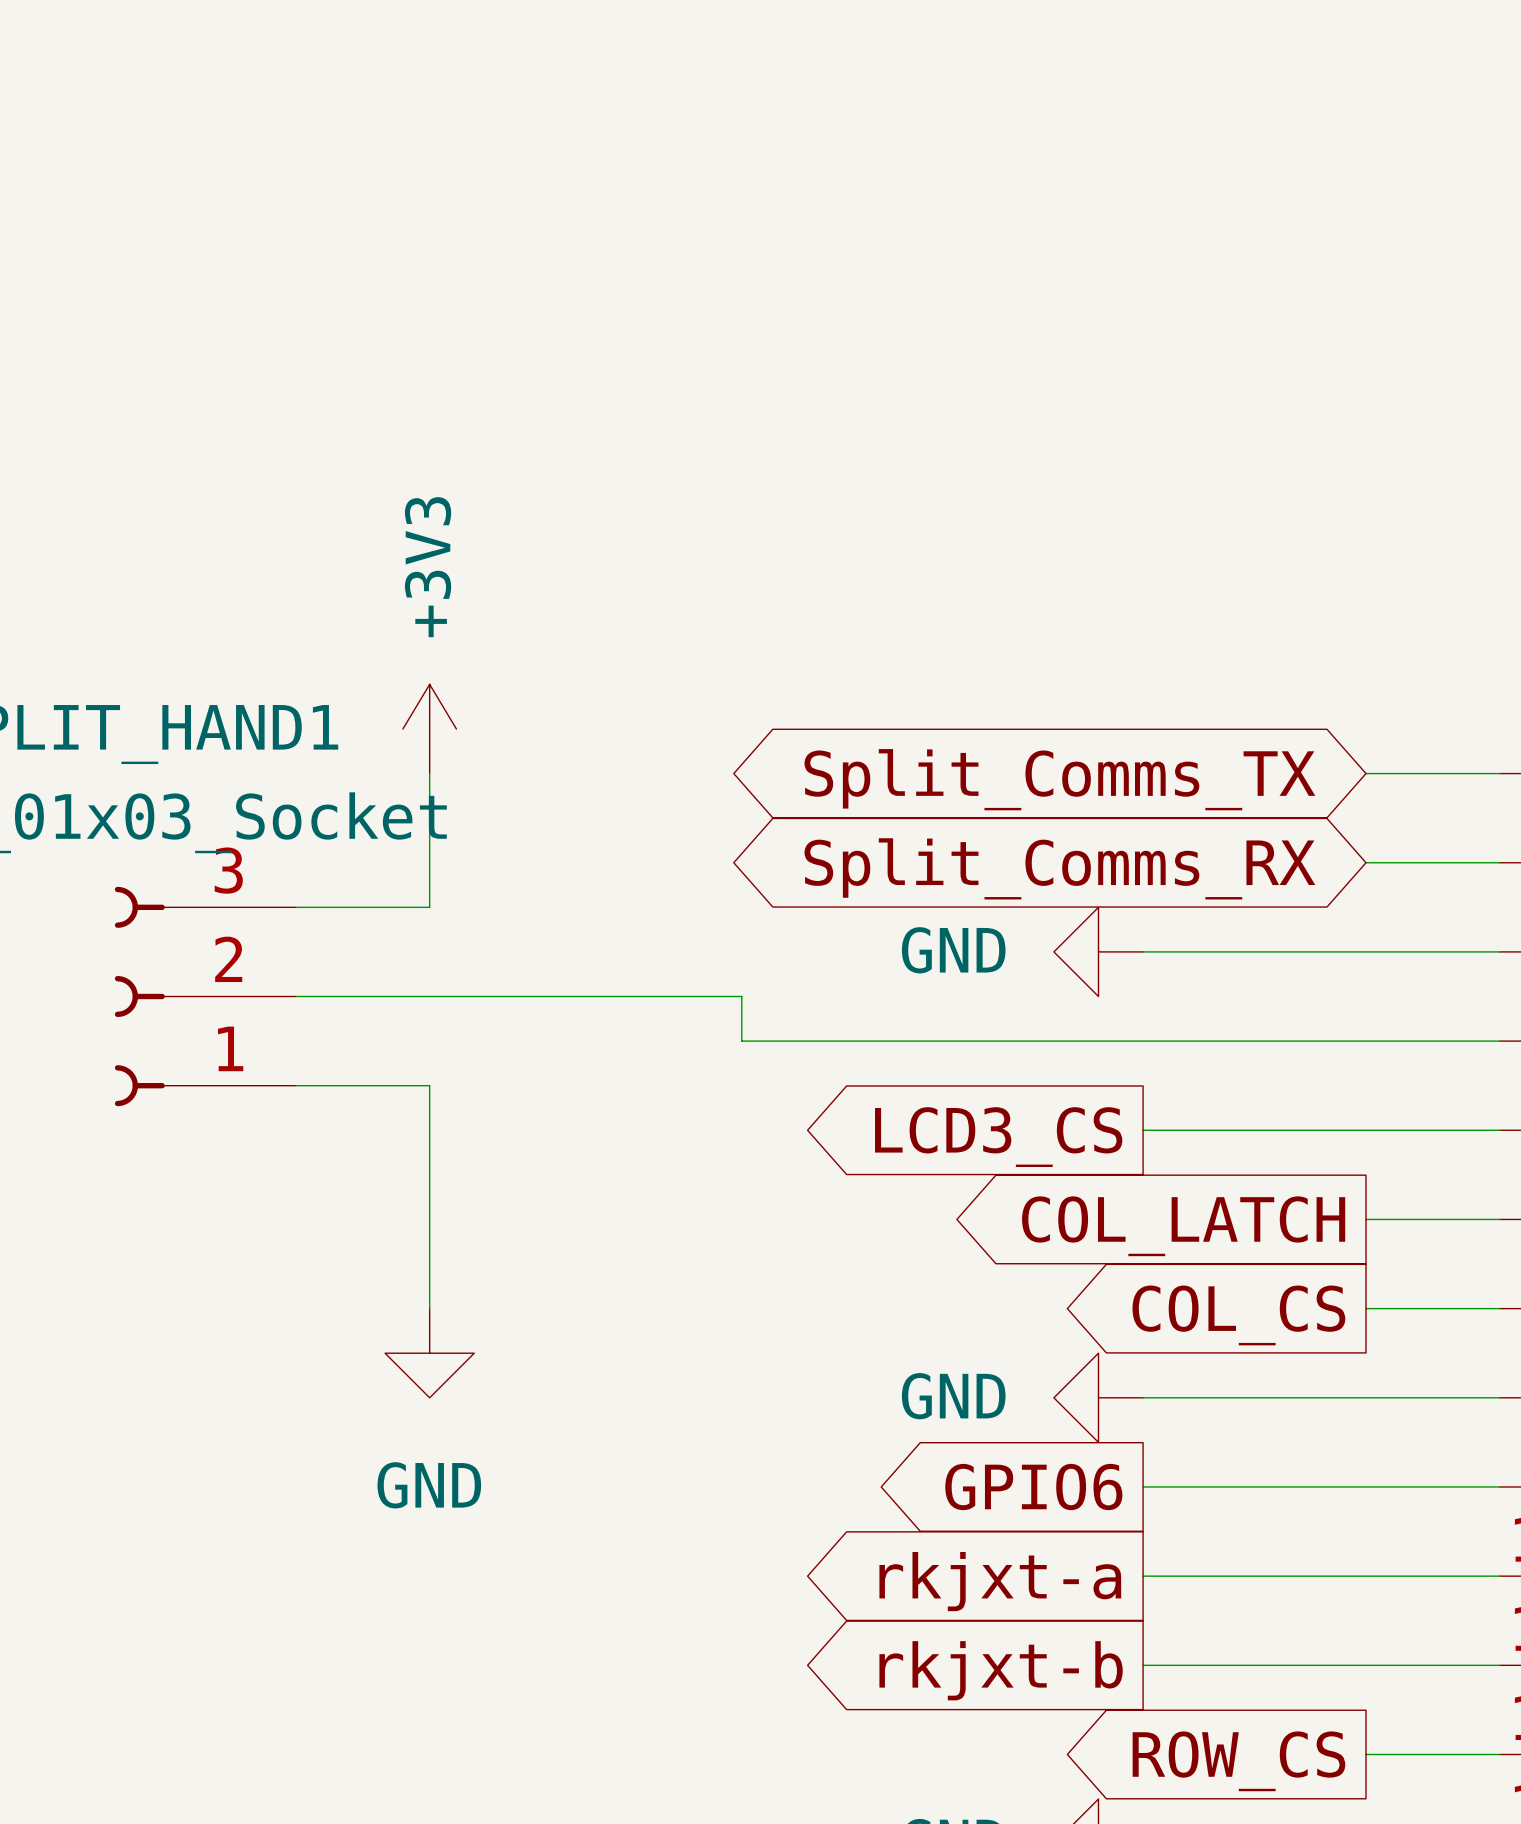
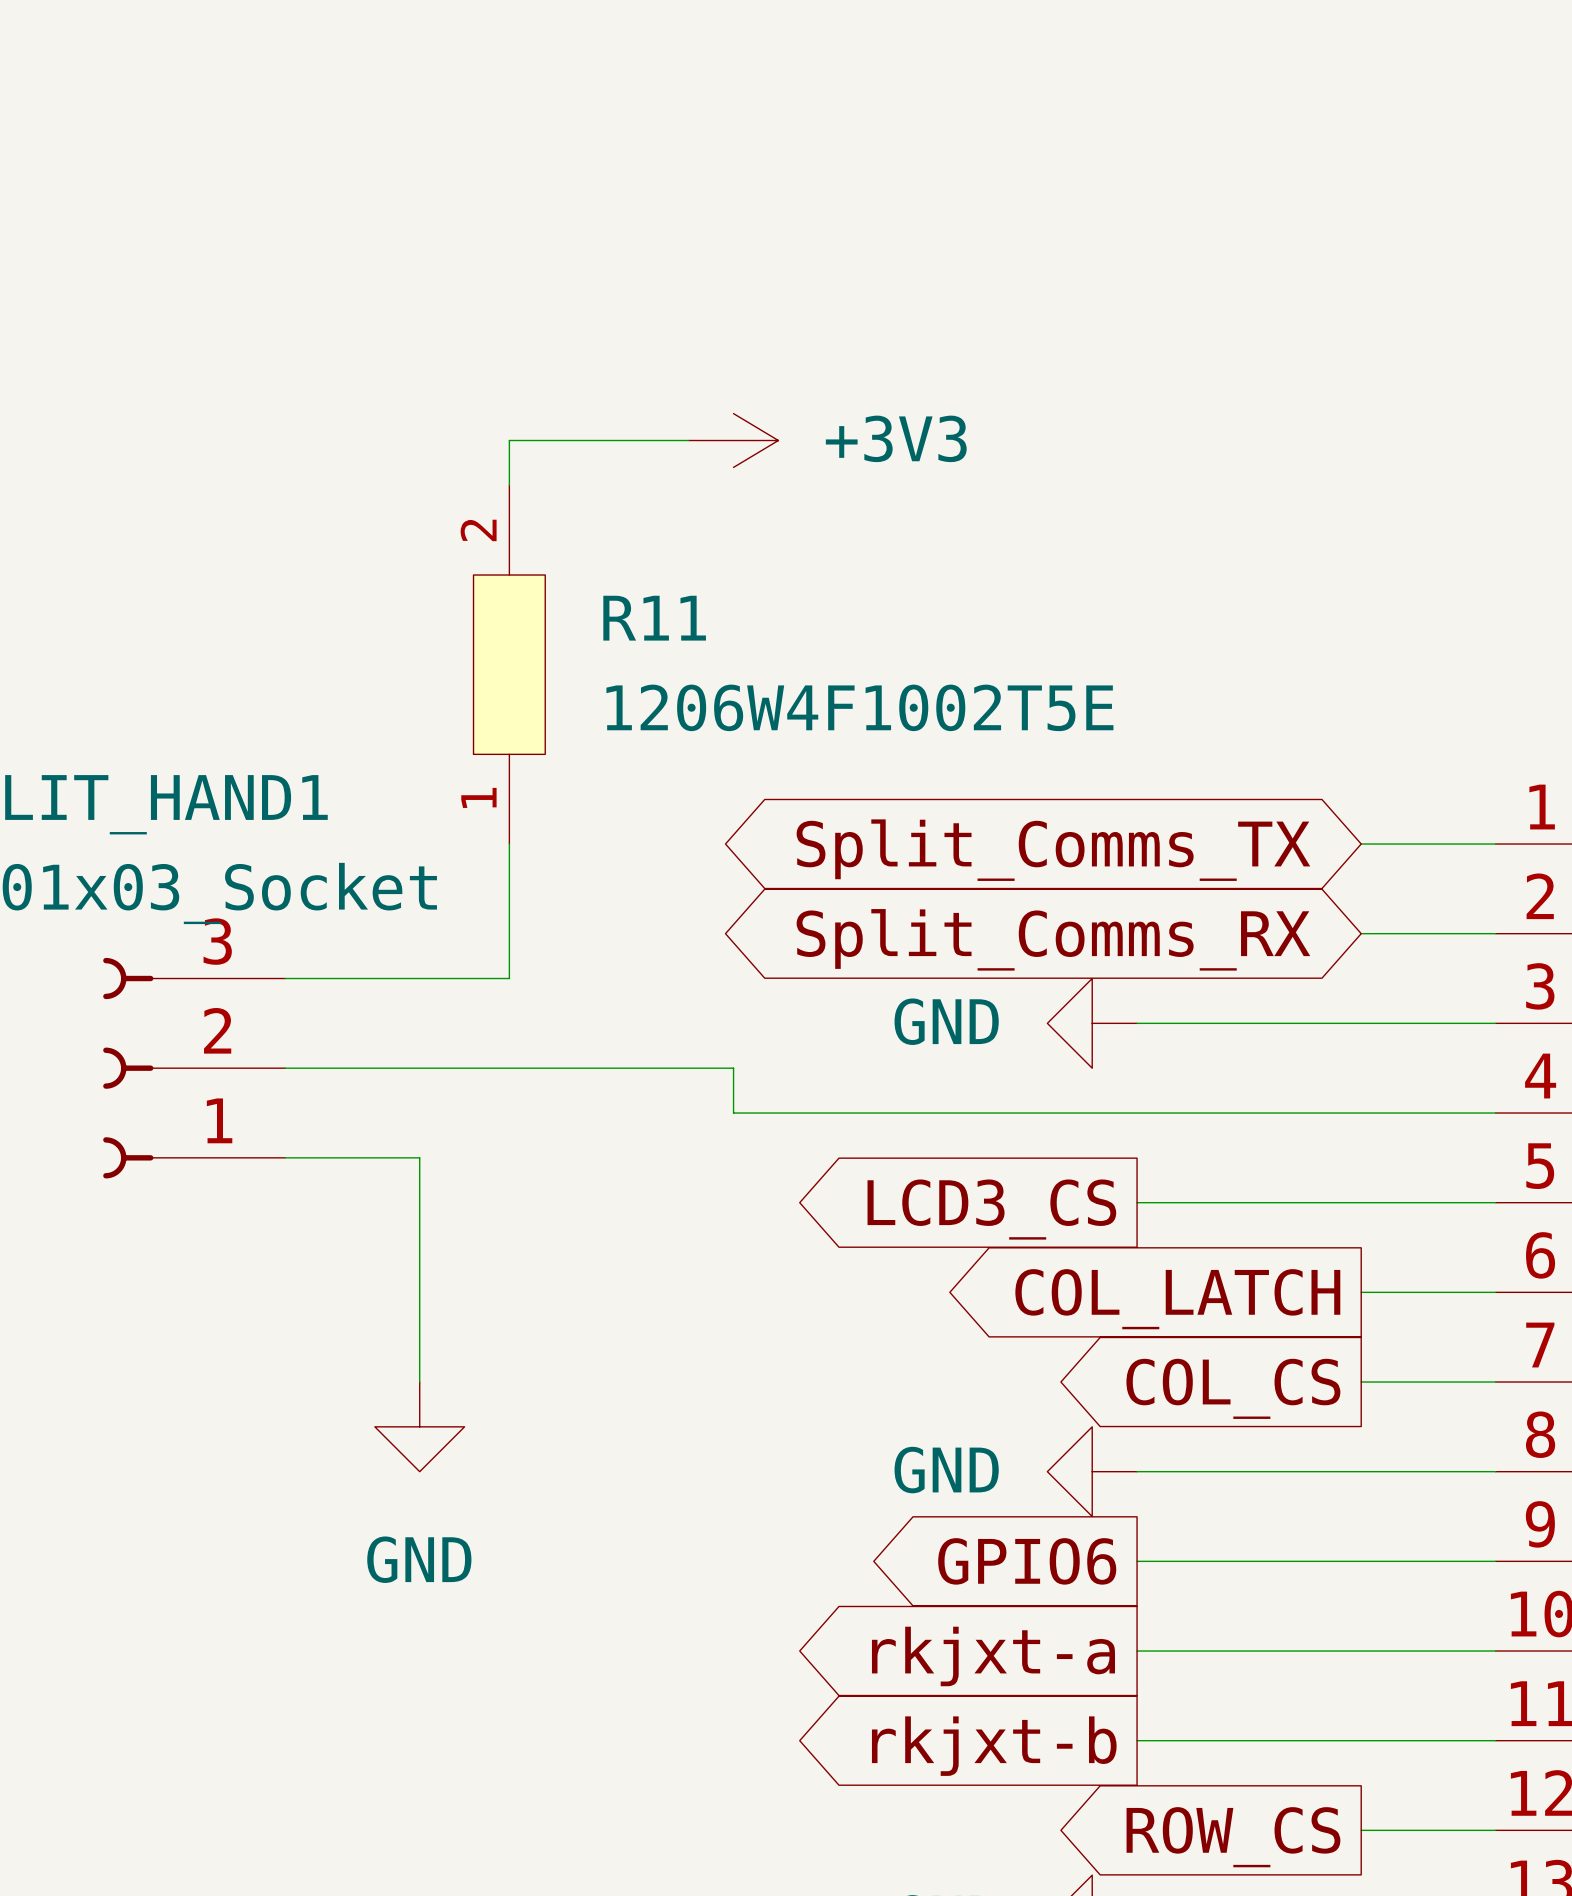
wire: none -> (688, 440) (509, 440) (509, 485)
R11: none -> 1206W4F1002T5E (509, 664)
power symbol rotation: 0° (429, 728) -> 90° clockwise (733, 440)
power symbol position: +3V3 (429, 728) -> +3V3 (733, 440)
wire: (429, 773) (429, 907) -> (509, 844) (509, 978) (419, 978)

